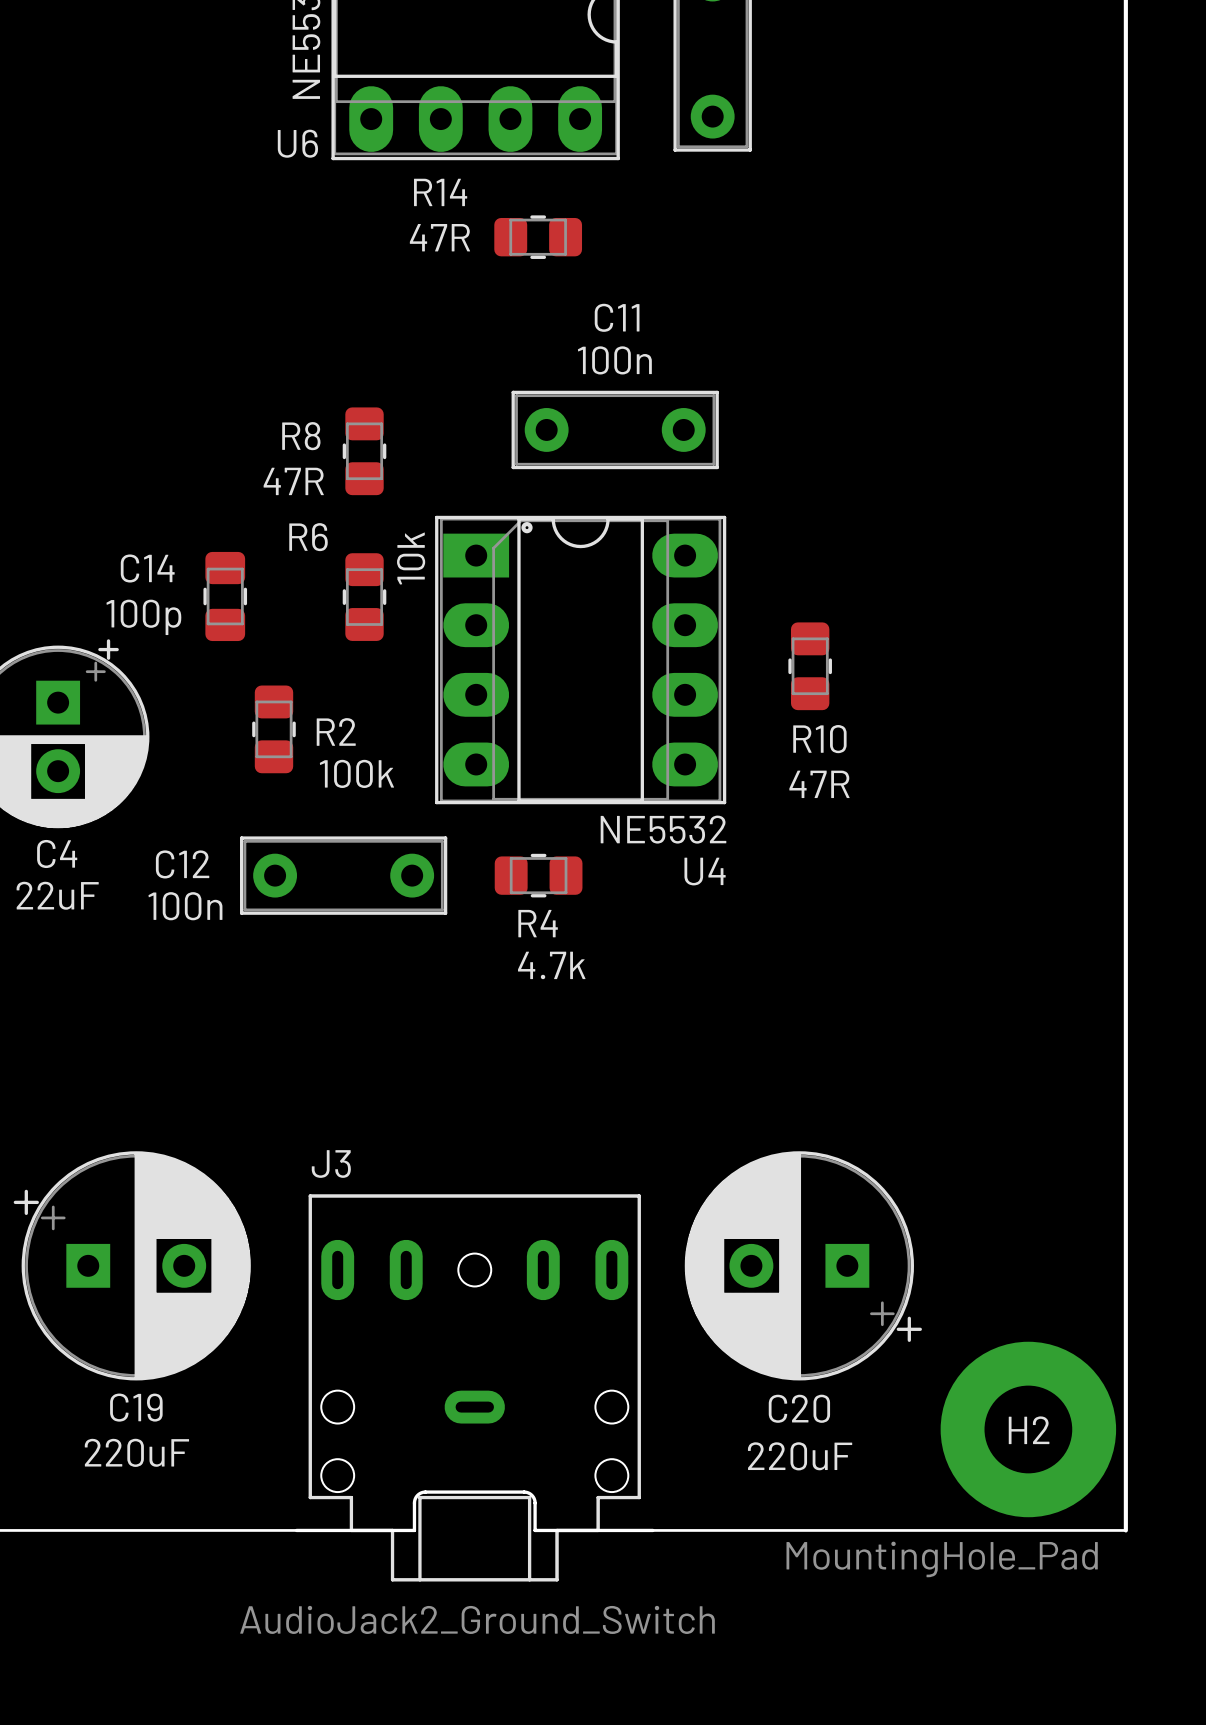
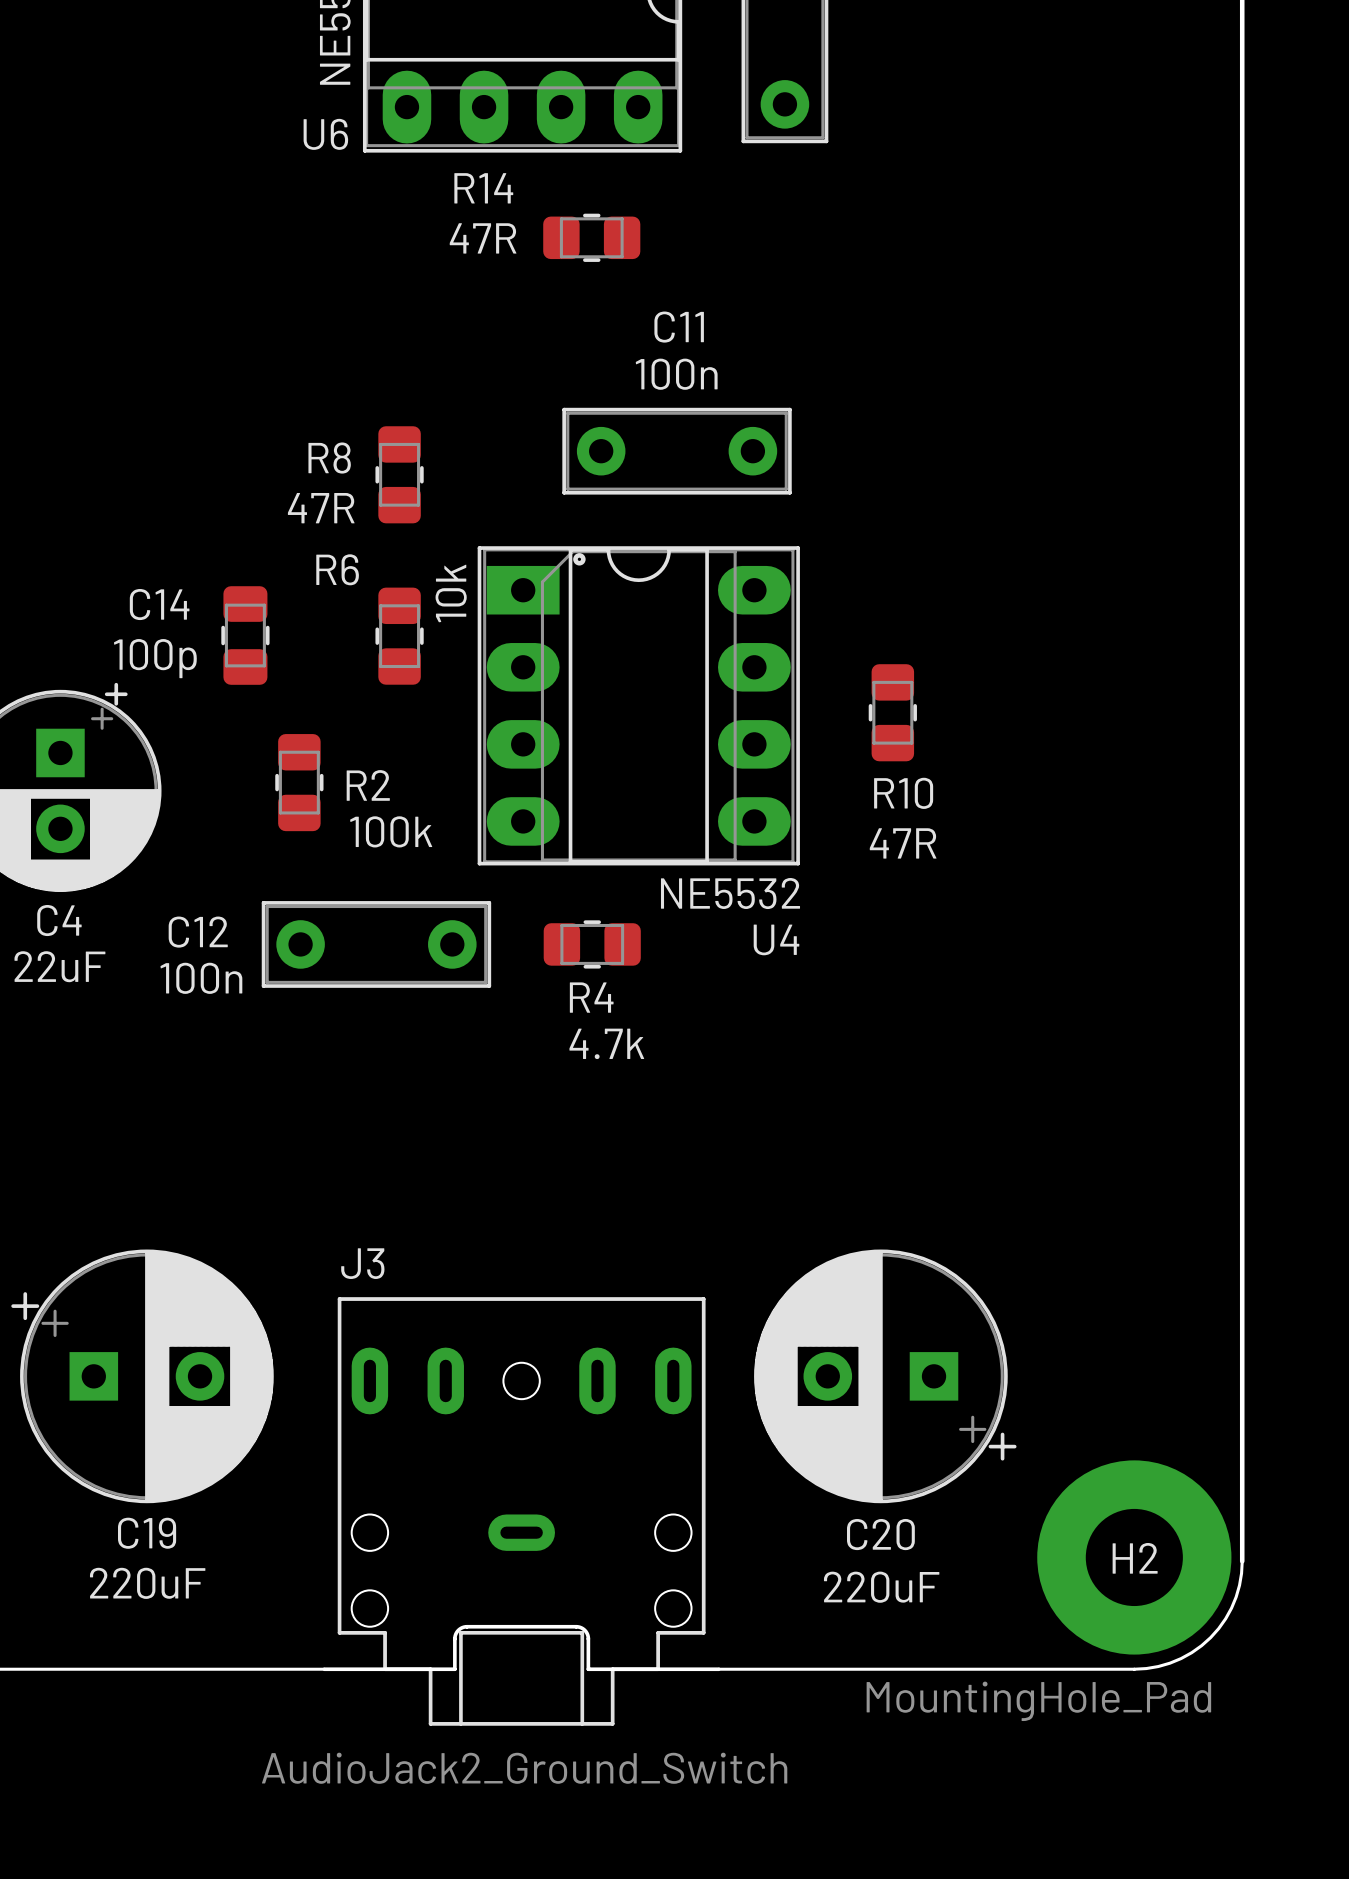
board edge: (1125, 1432) (1125, 1530) (1028, 1530) -> (1242, 1561) (1239, 1585) (1231, 1608) (1210, 1637) (1191, 1652) (1169, 1663) (1134, 1669)

